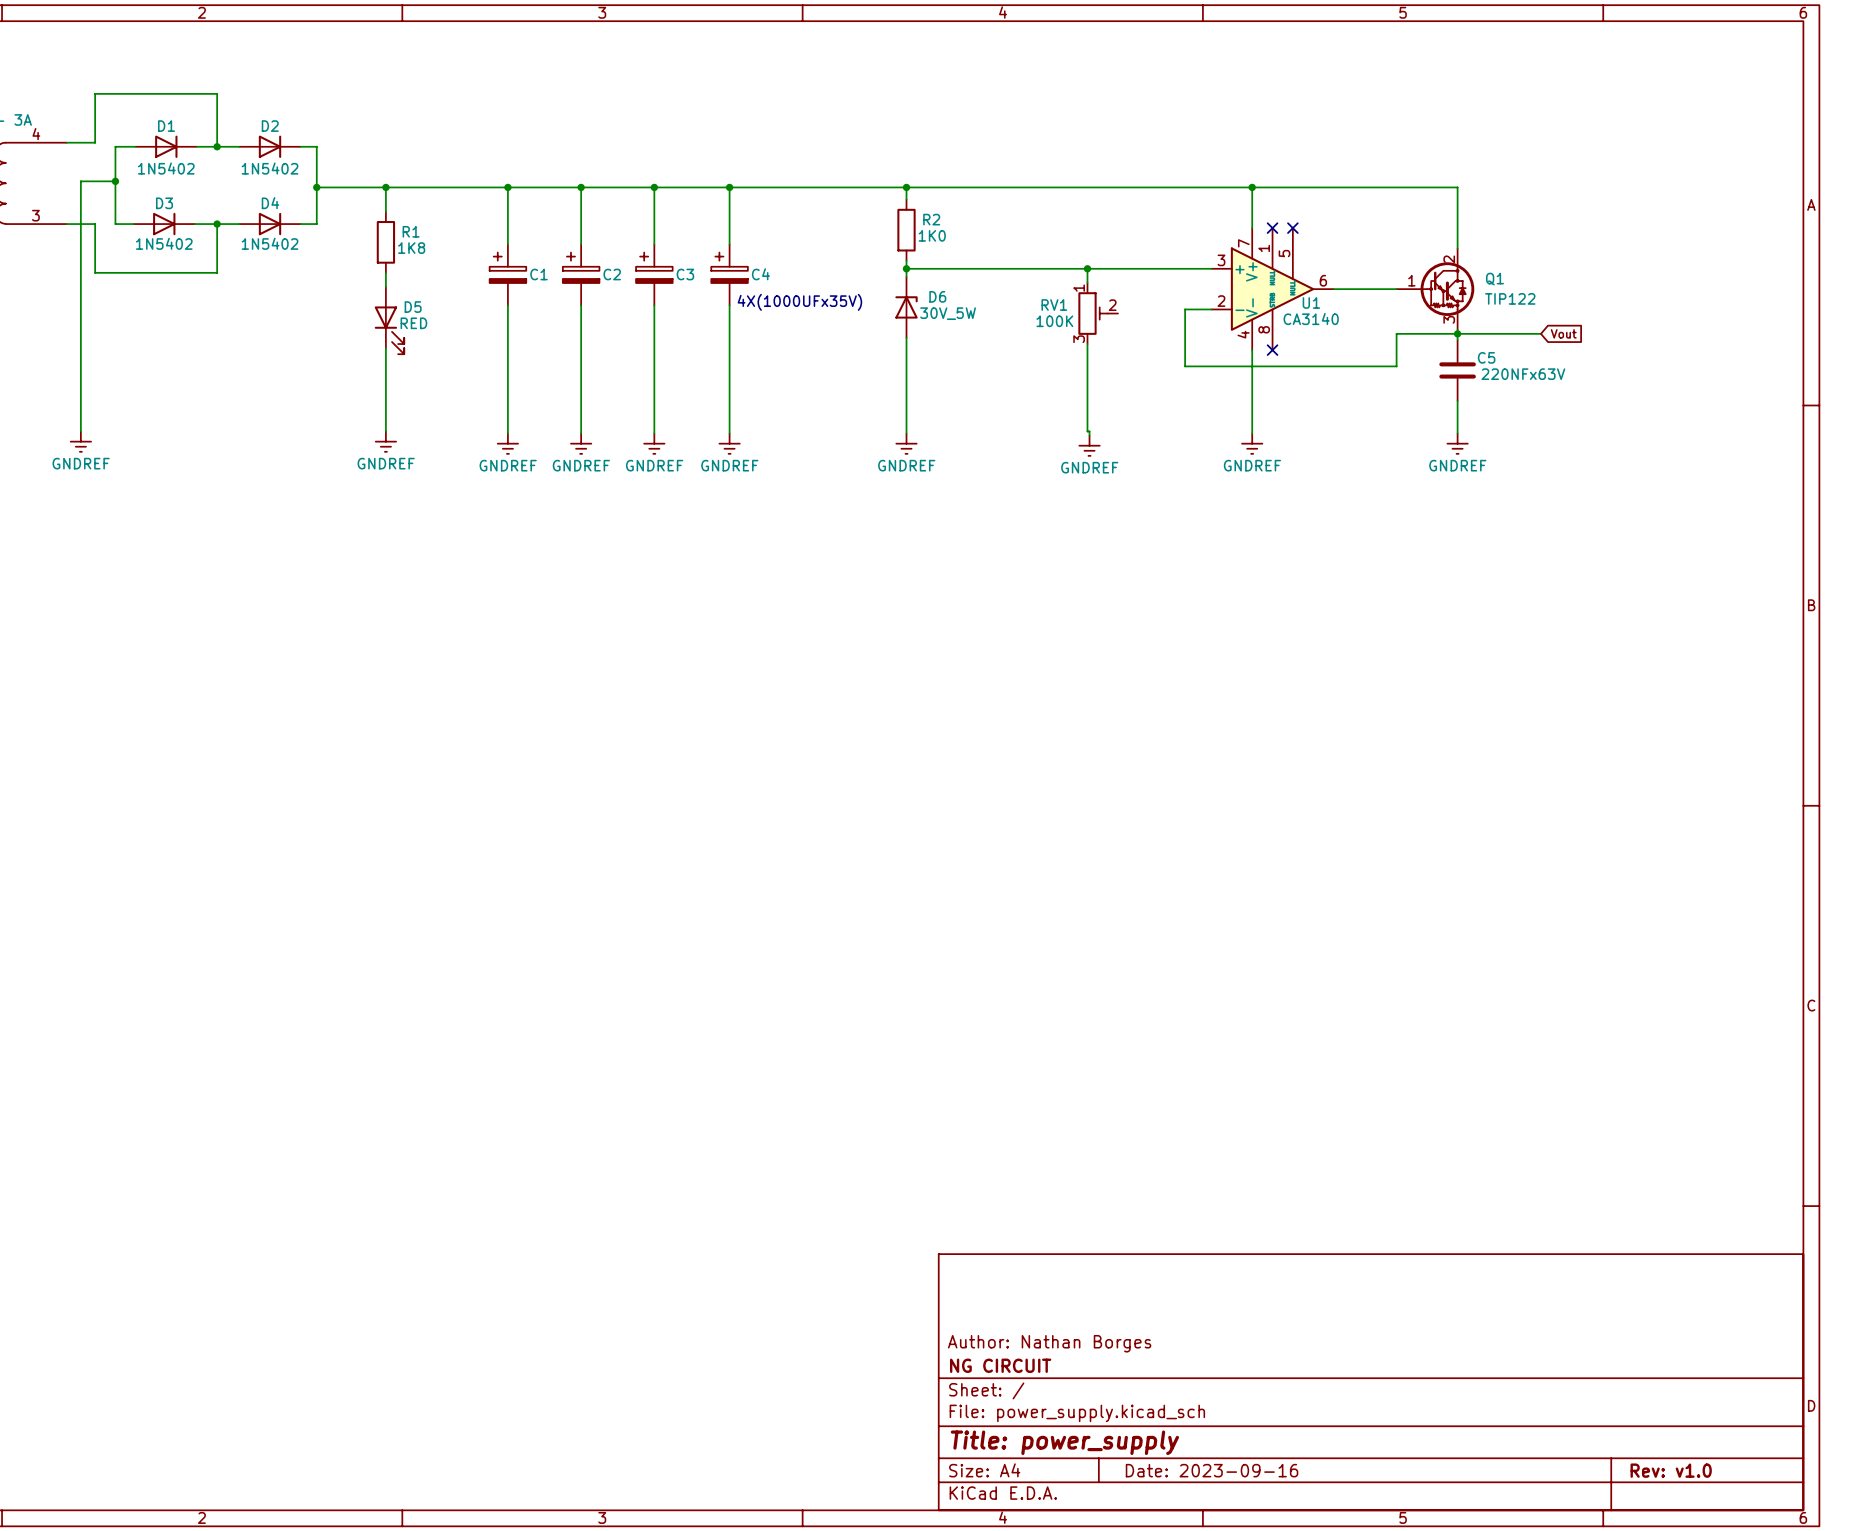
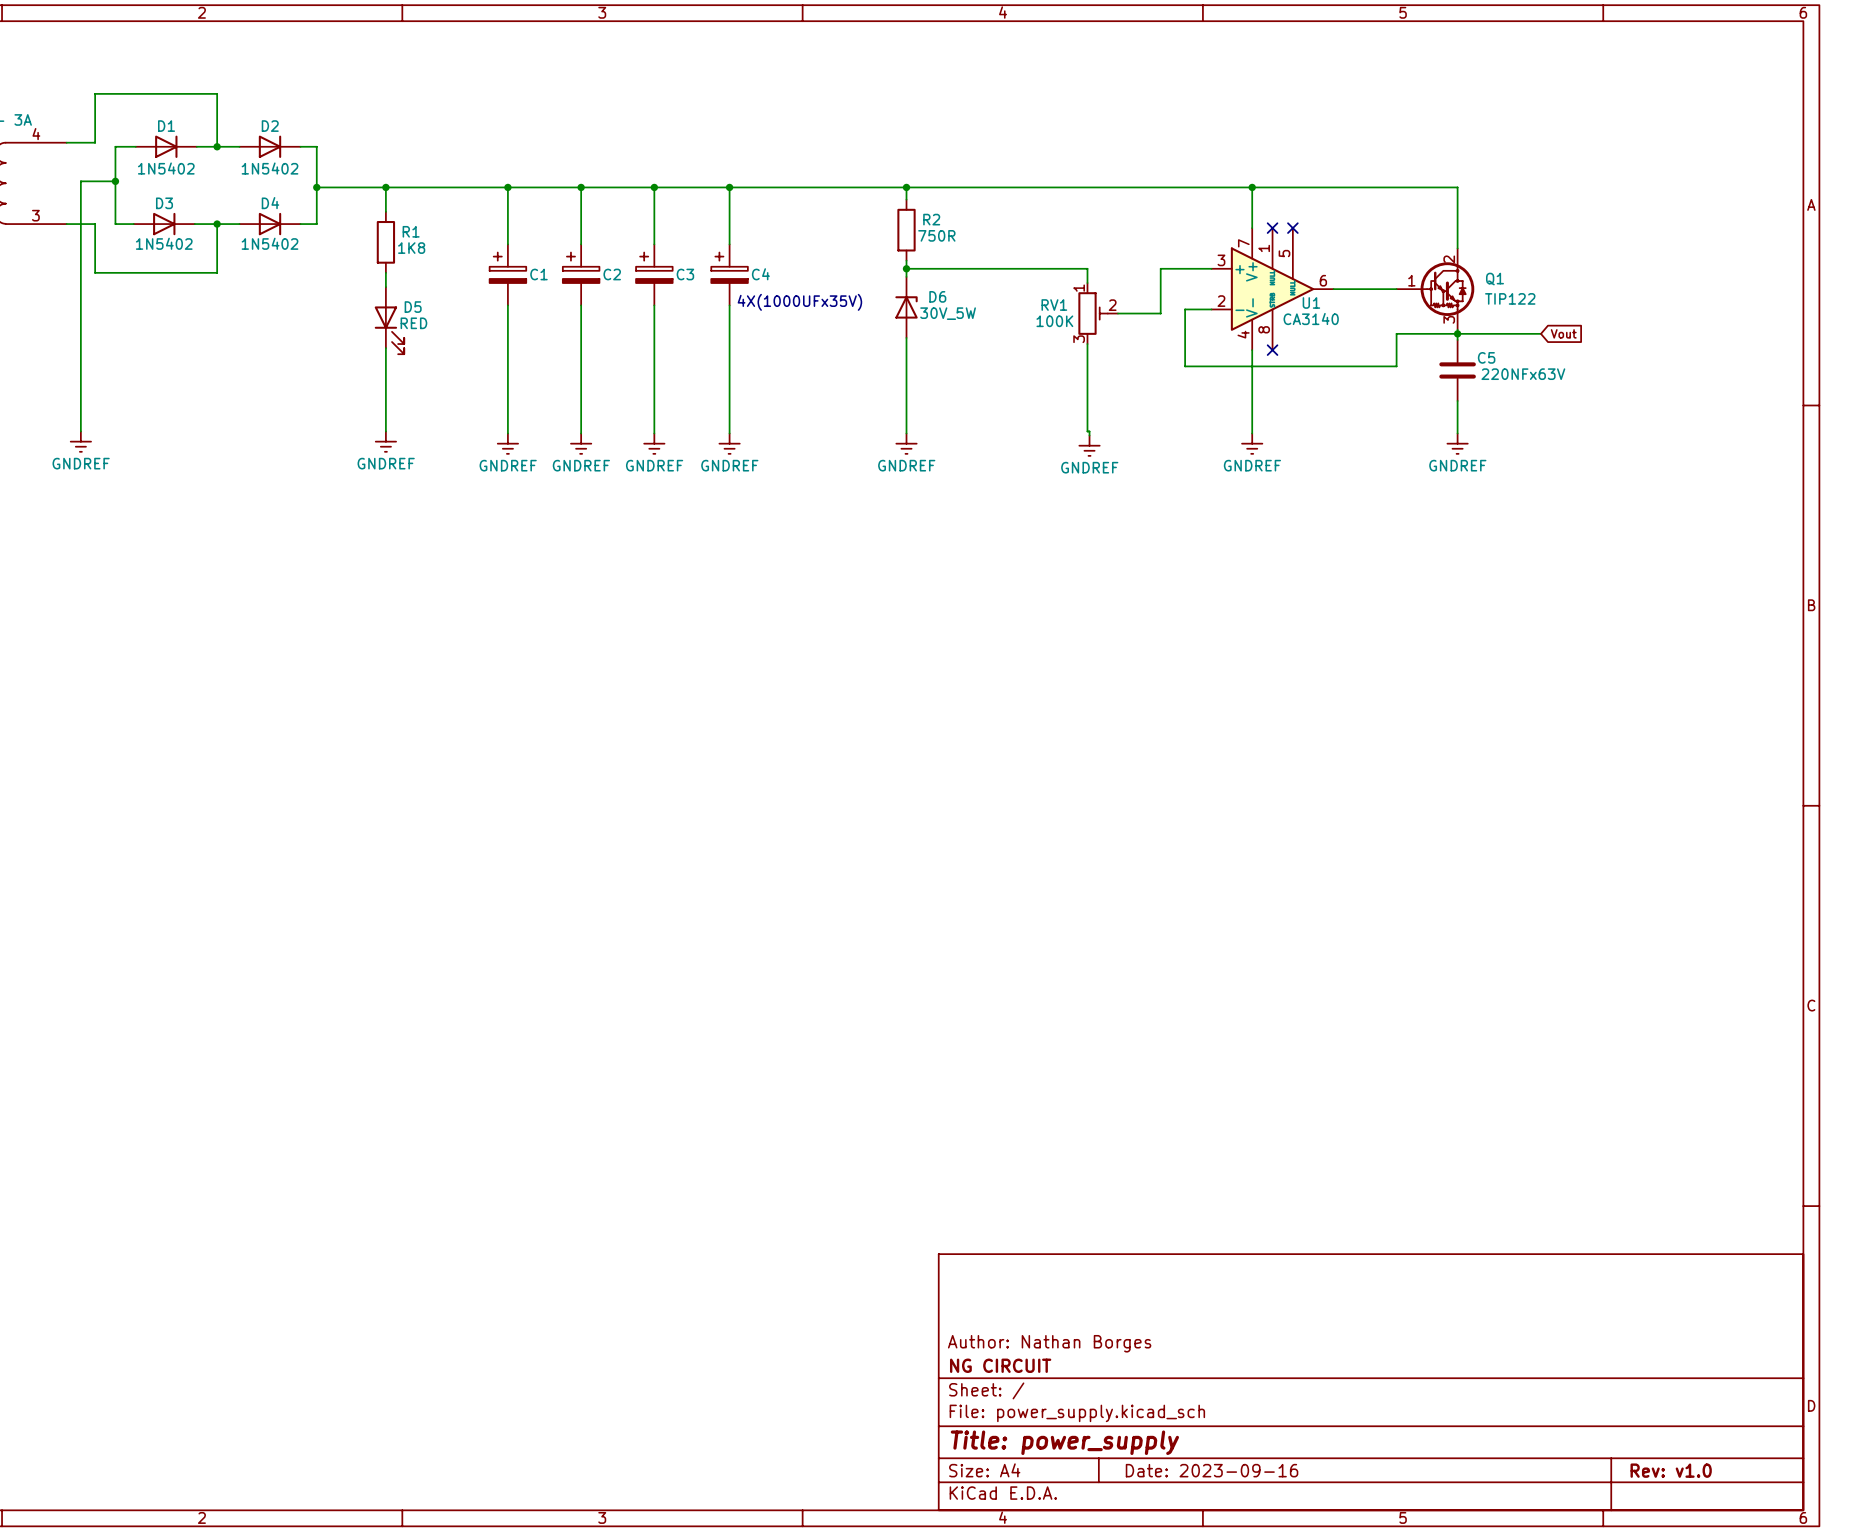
R2 value: 1K0 (932, 235) -> 750R (936, 235)
wire: (1087, 268) (1160, 268) -> (1117, 313) (1160, 313) (1160, 268)
junction: (1087, 268) -> none

